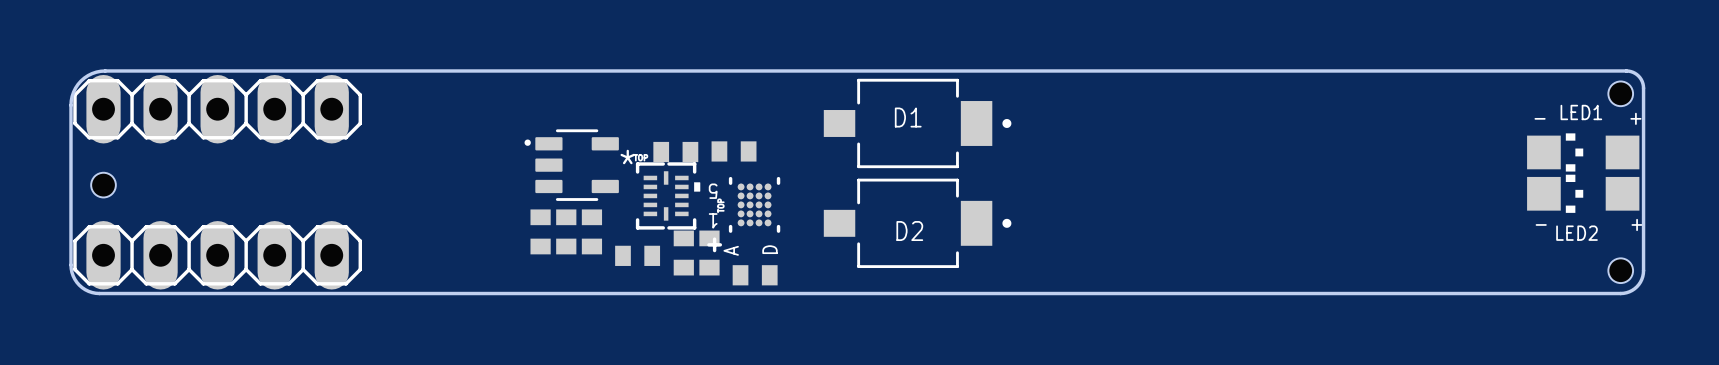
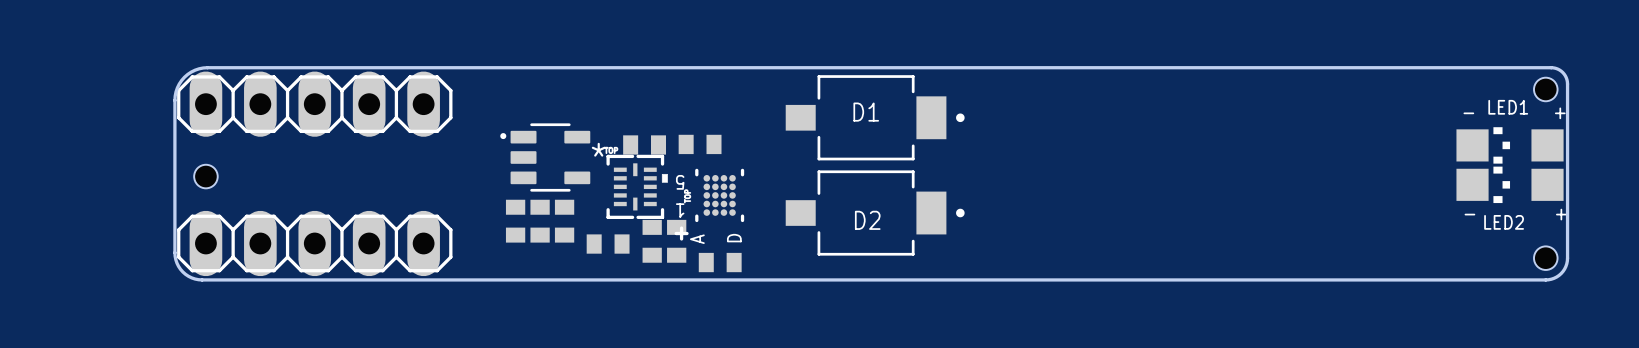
board edge: (217, 70) (96, 72) (84, 78) (78, 84) (72, 96) (70, 105) (70, 264) (76, 282) (85, 289) (95, 293) (211, 293) -> (207, 67) (195, 70) (184, 77) (177, 87) (174, 100) (175, 256) (178, 266) (185, 274) (202, 279)
part: (217, 109) -> none
part: none -> (314, 104)
hole position: (103, 185) -> (205, 176)
part: (217, 255) -> none
part: none -> (314, 243)

